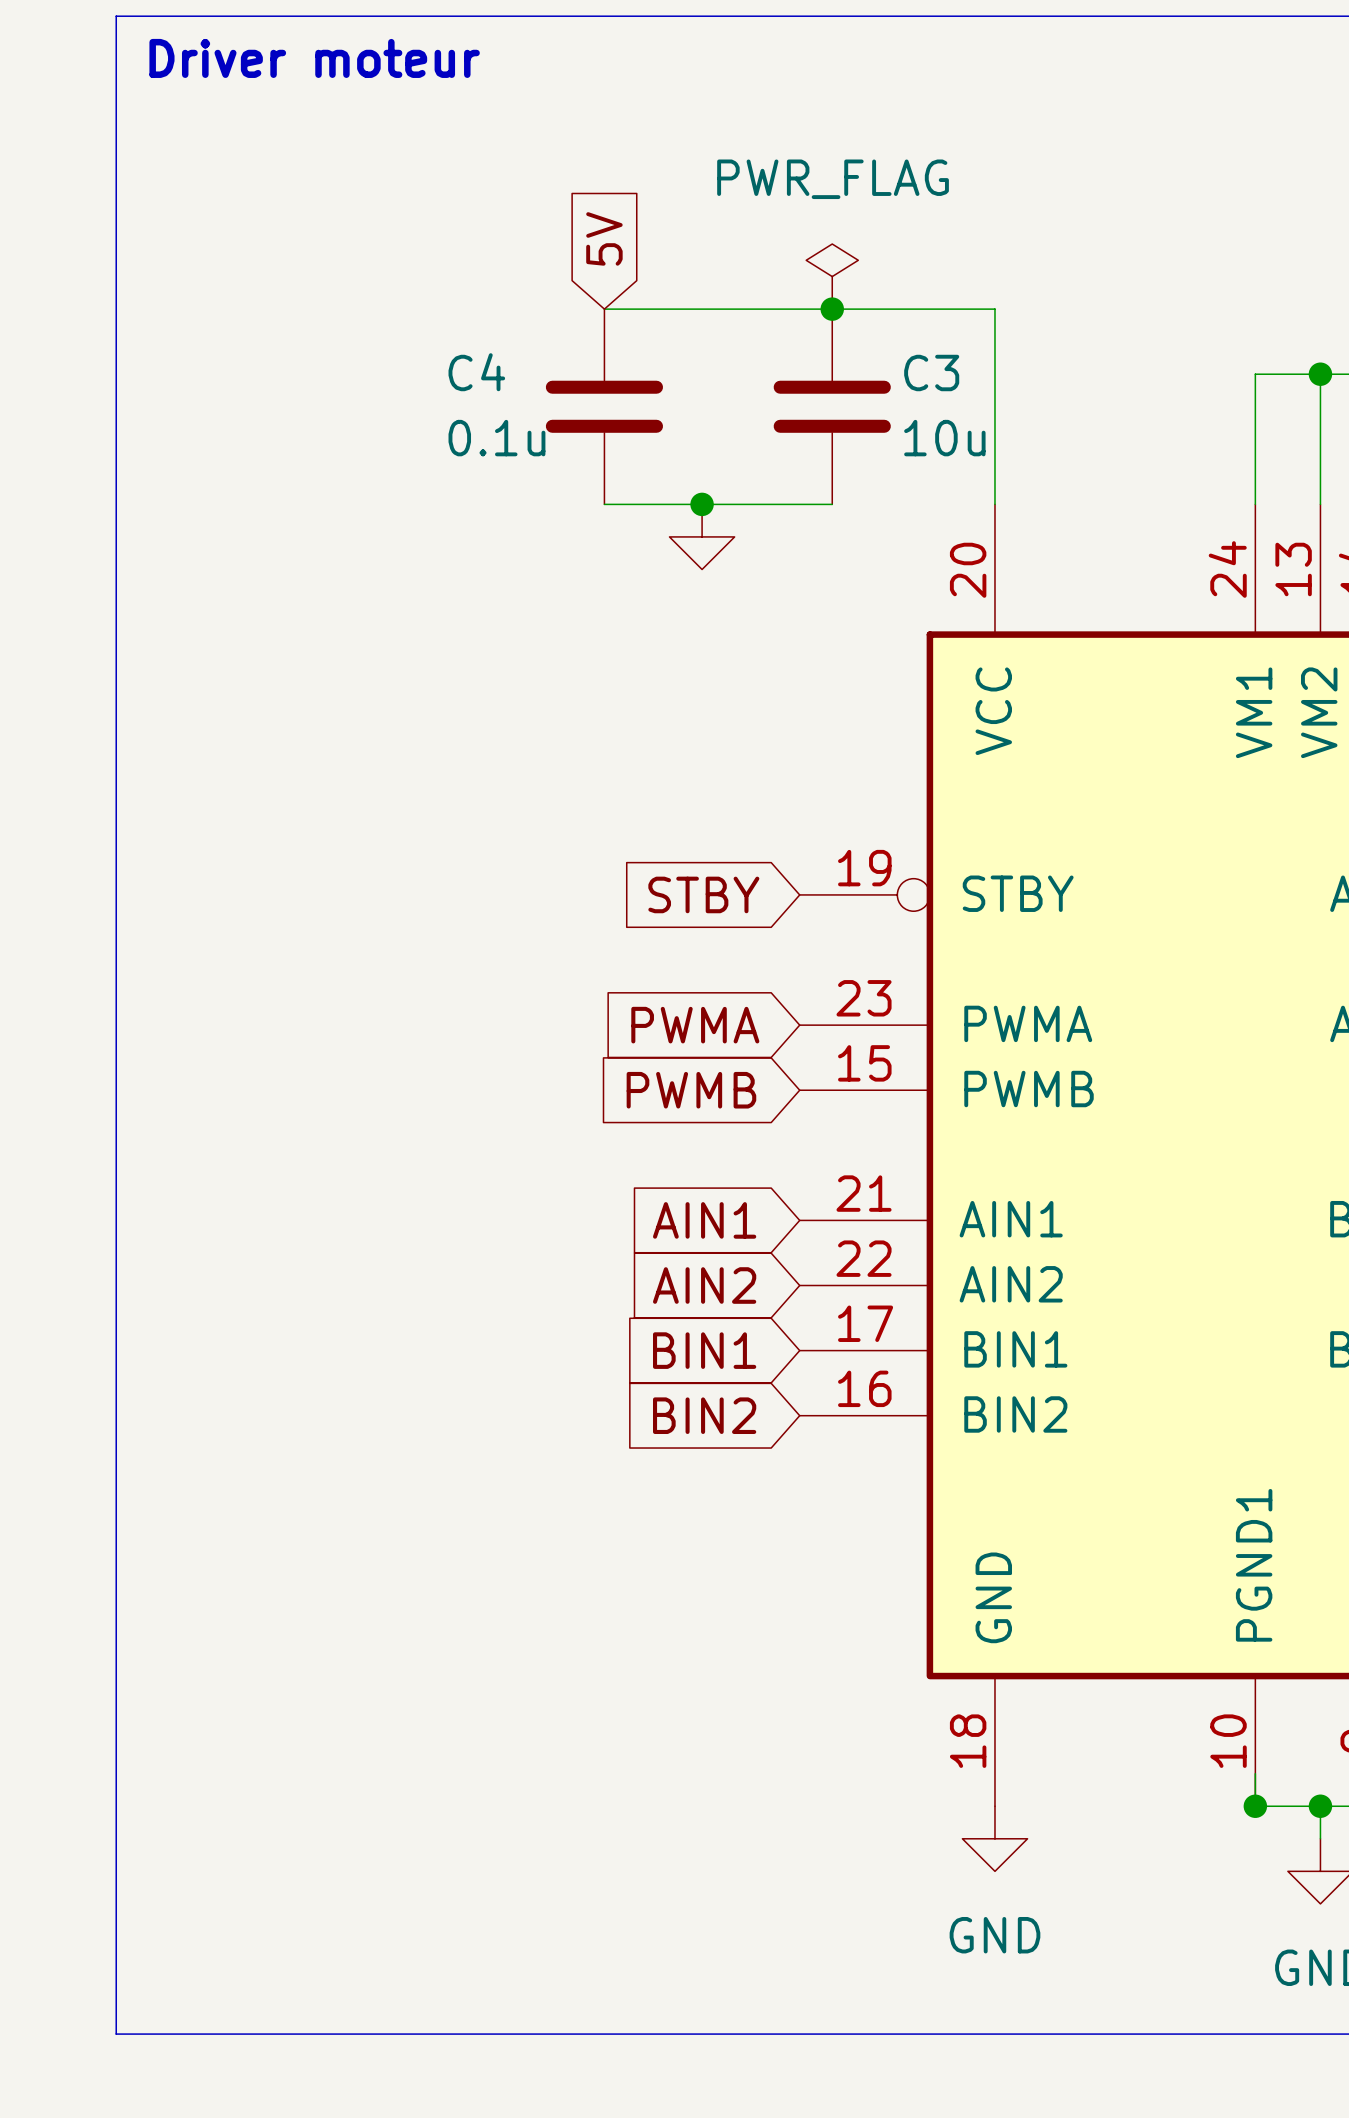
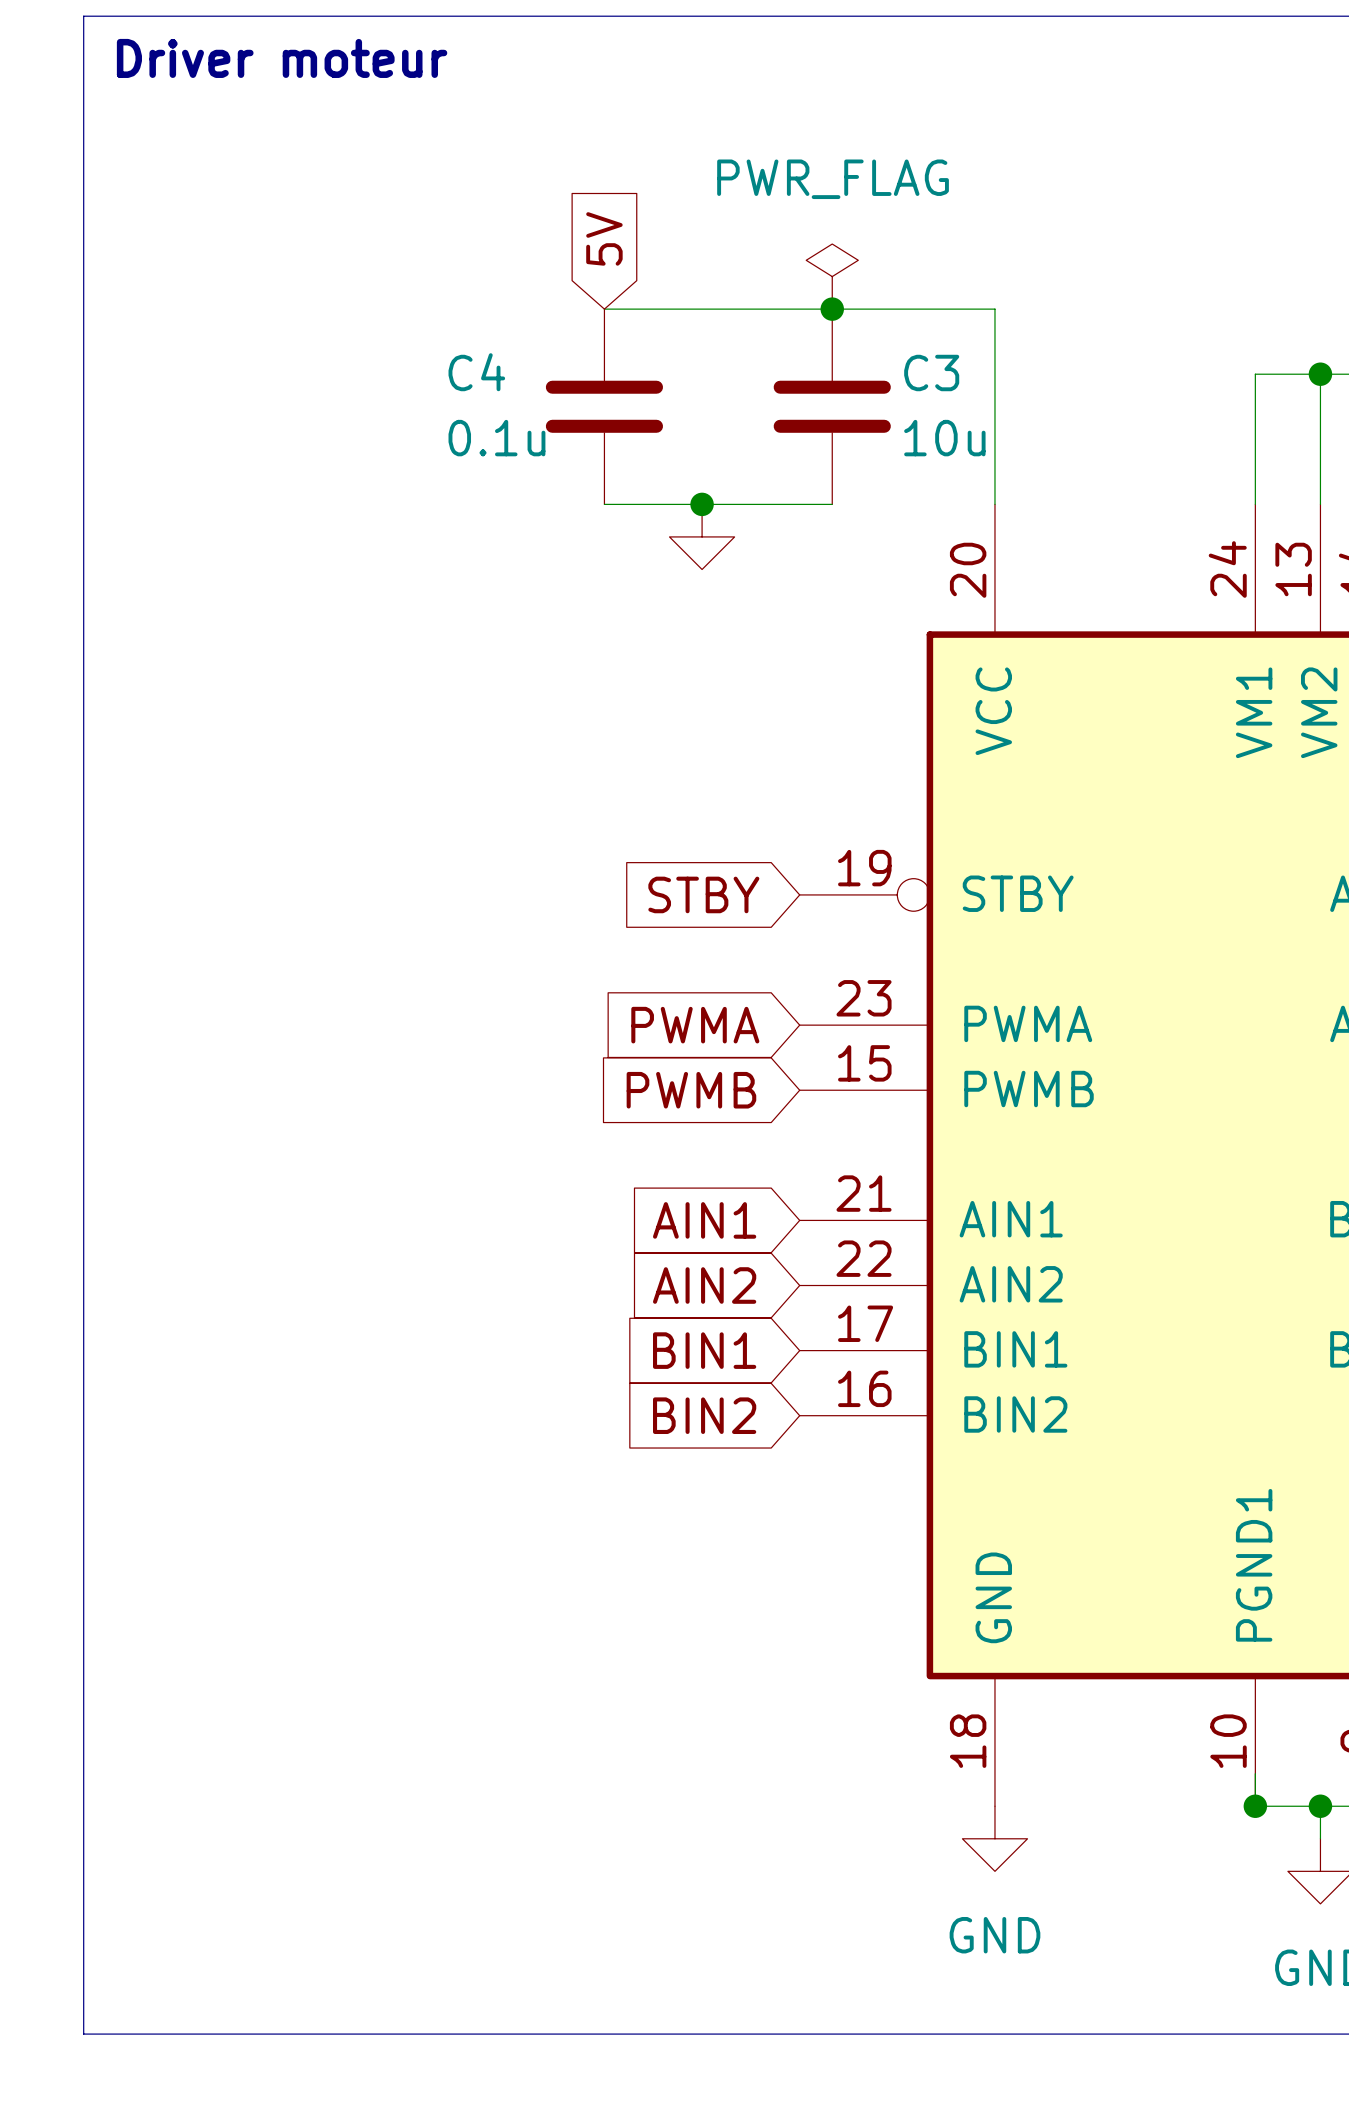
line: (116, 16) (116, 2034) -> (116, 16) (83, 16) (83, 2034) (116, 2034)
text position: Driver moteur (314, 58) -> Driver moteur (282, 58)

